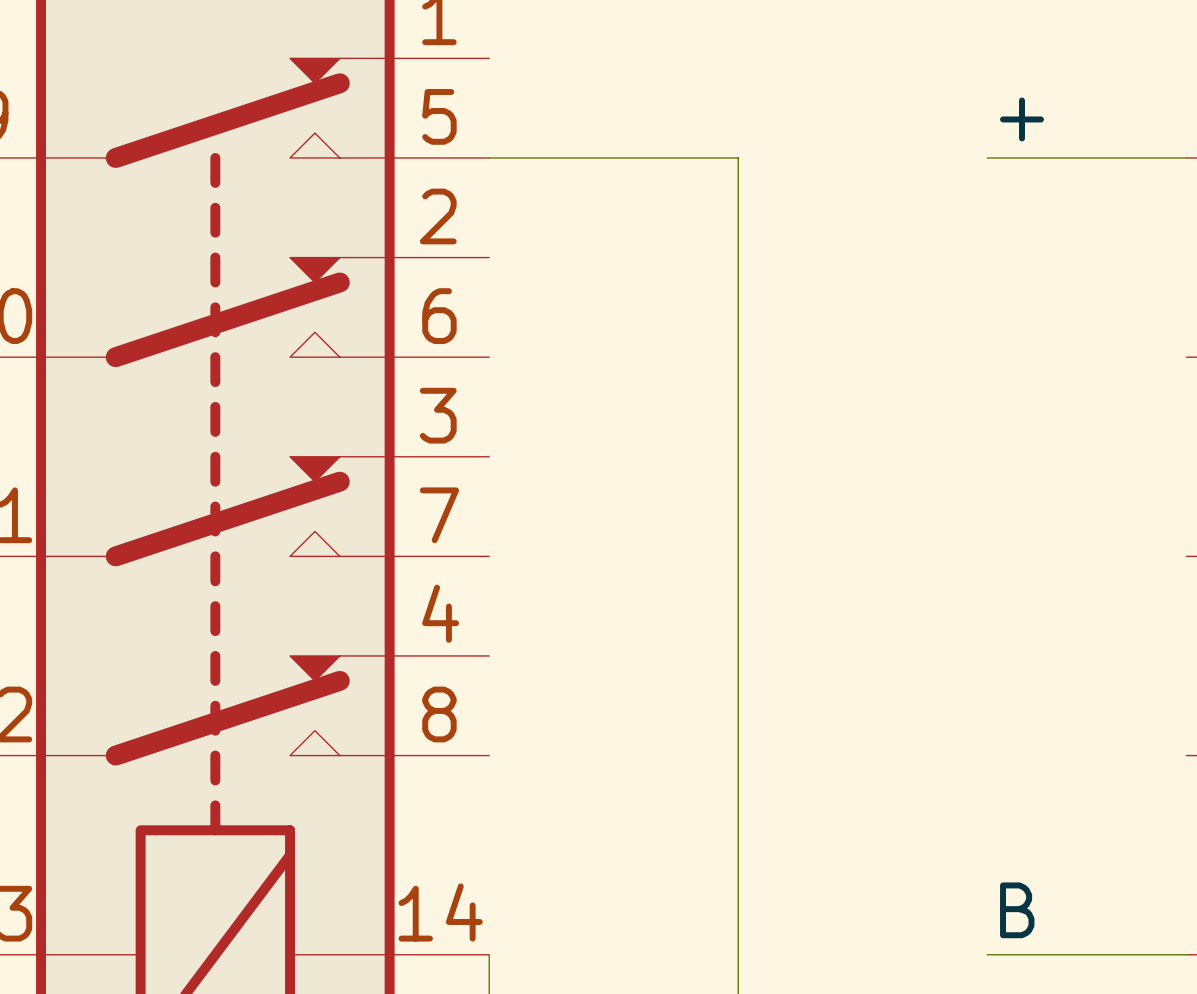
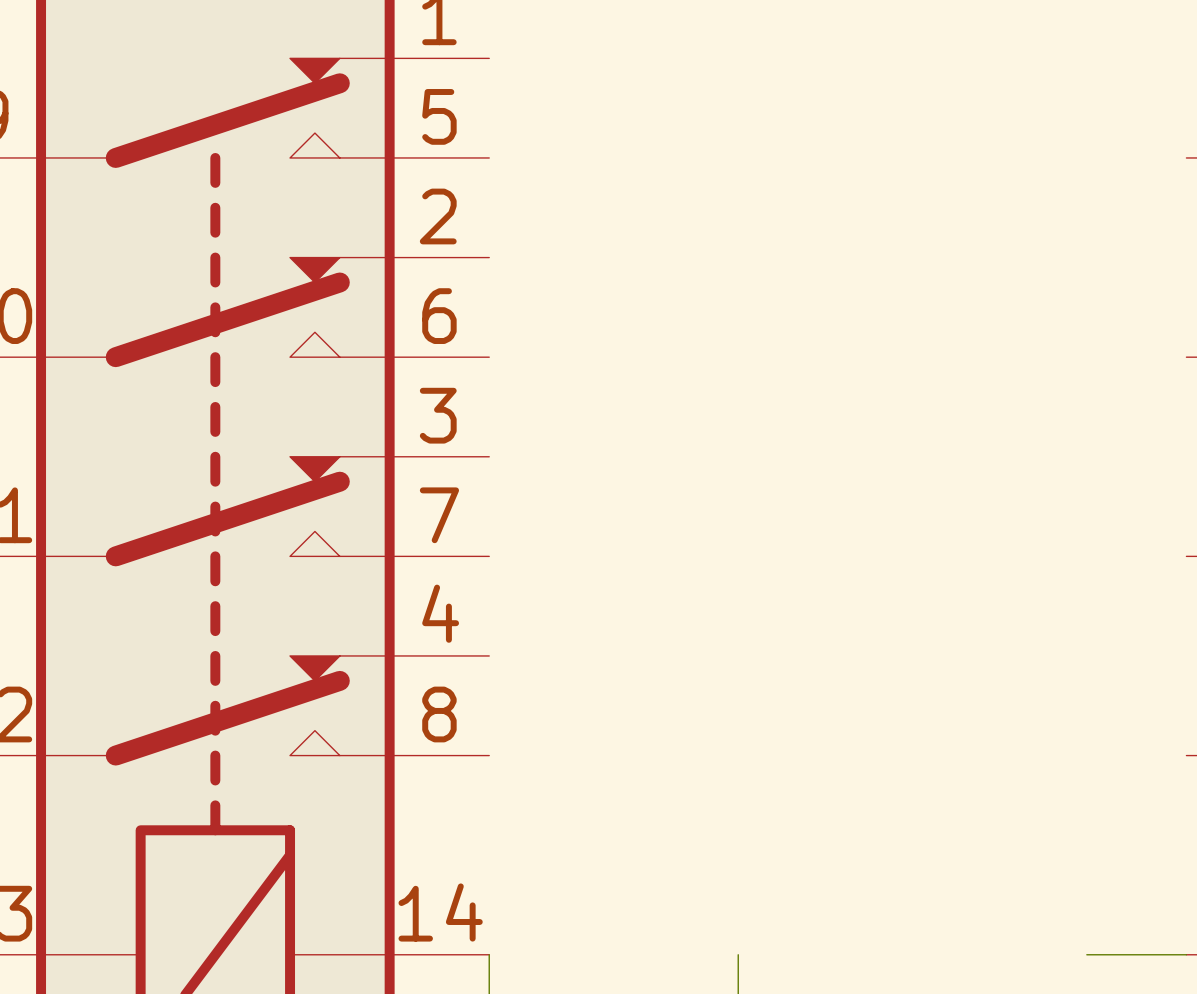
label: + (1021, 119) -> none
wire: (489, 157) (738, 157) (738, 954) -> none
wire: (987, 157) (1186, 157) -> none
label: B (1017, 910) -> none
wire: (987, 954) (1086, 954) -> none

